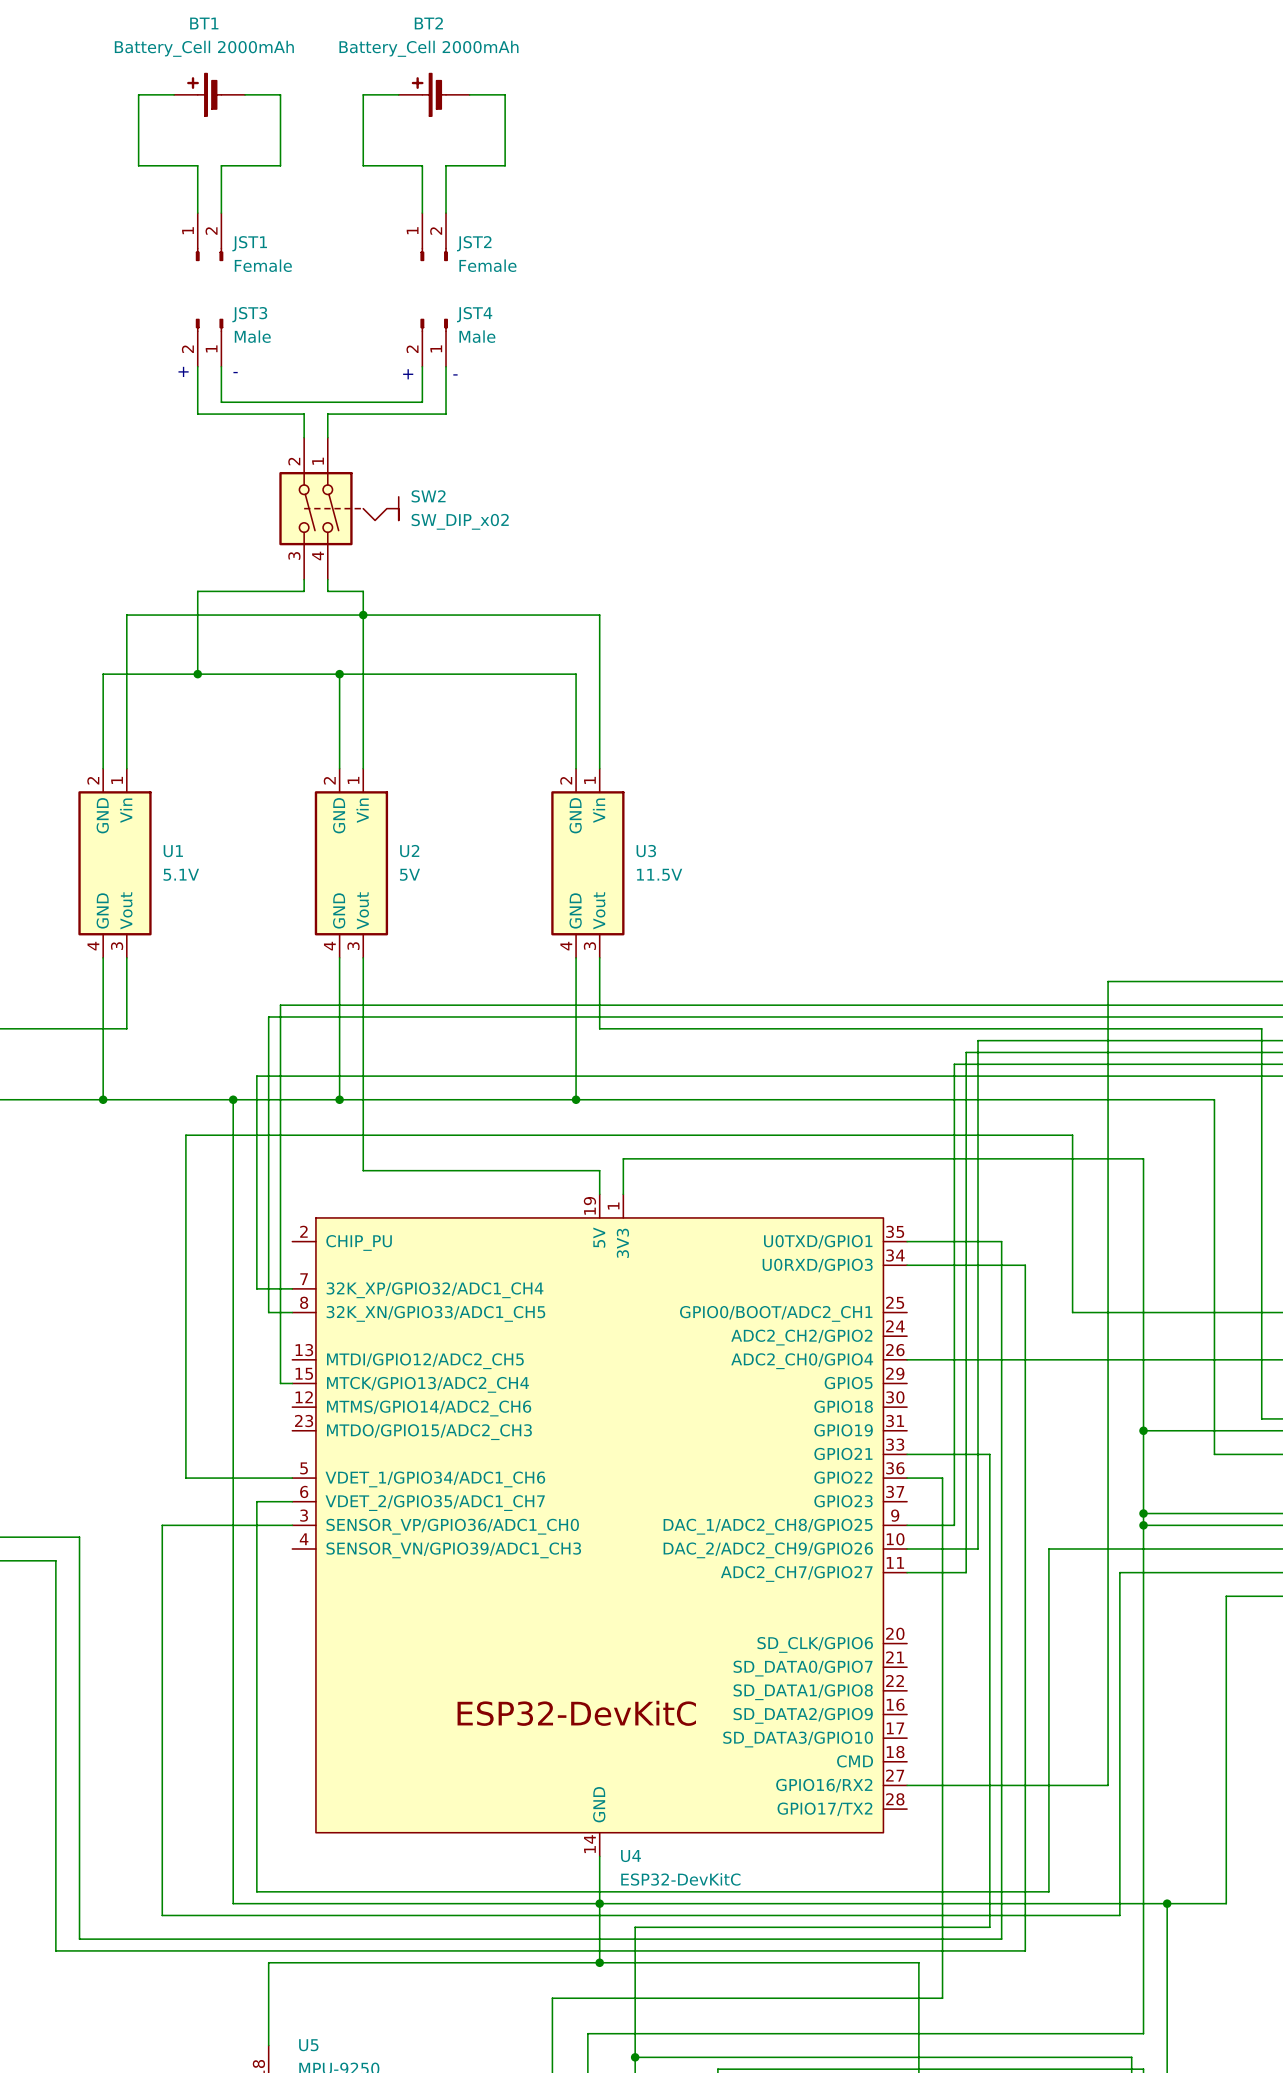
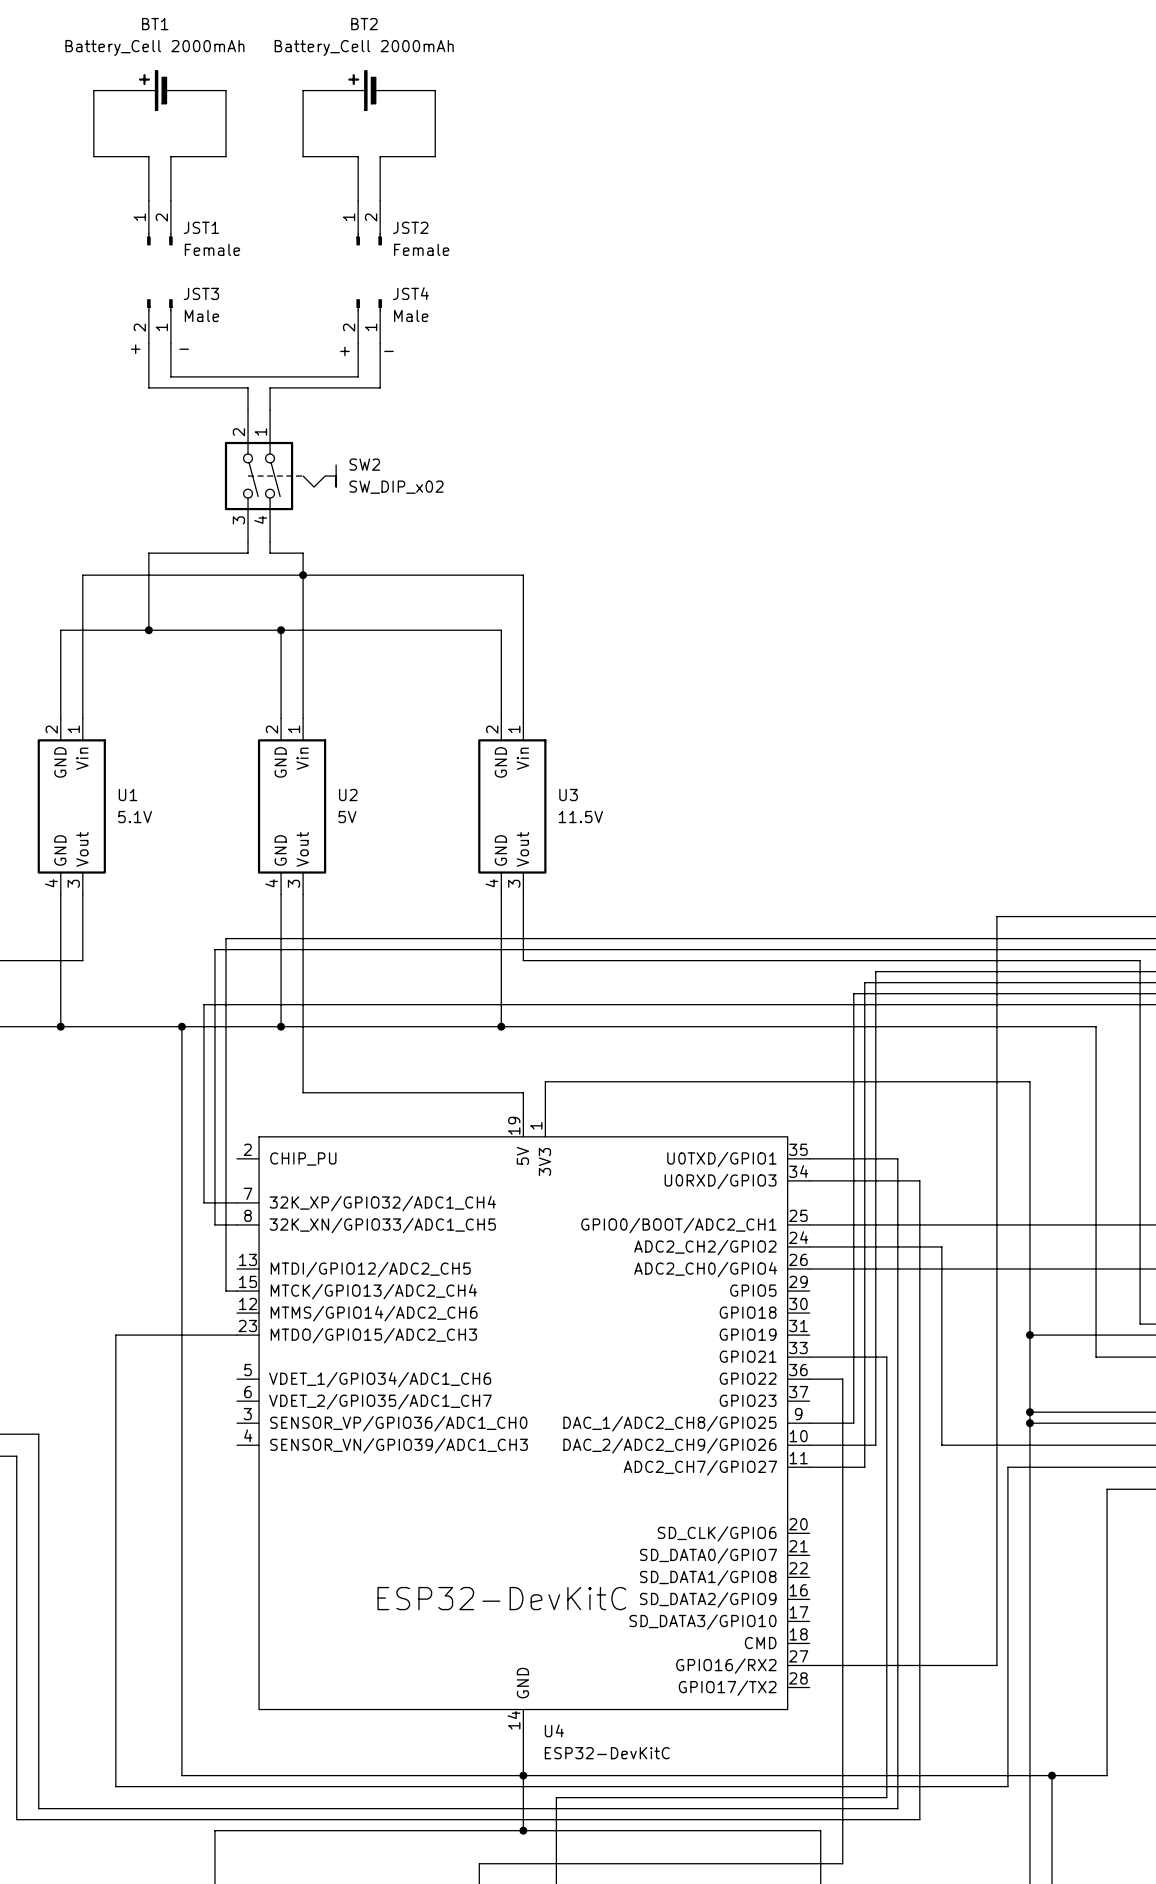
wire: (1072, 1312) (1072, 1135) (185, 1135) (185, 1478) (292, 1478) -> (963, 1224) (809, 1224)
wire: (292, 1501) (256, 1501) (256, 1891) (1048, 1891) (1048, 1548) -> (809, 1246) (941, 1246) (941, 1445)
wire: (162, 1525) (292, 1525) -> (115, 1423) (115, 1335) (237, 1335)

